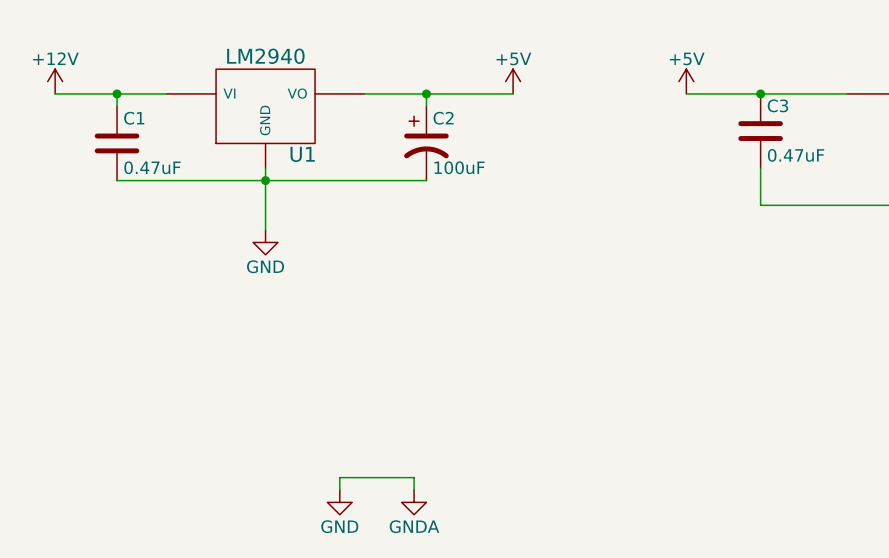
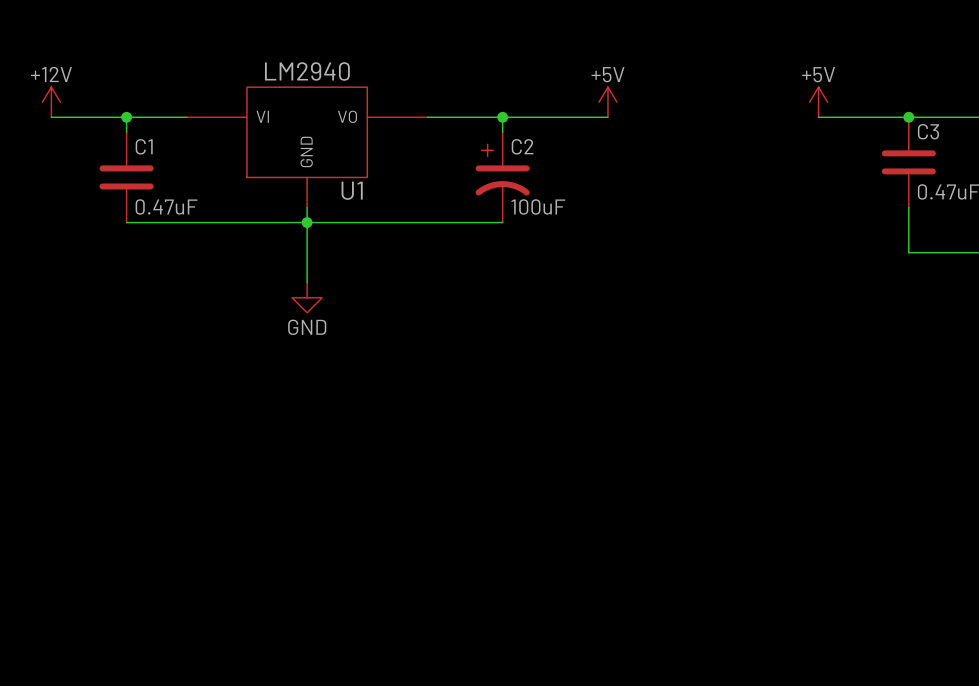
wire: (339, 490) (339, 477) (414, 477) (414, 490) -> none
power symbol: GND (339, 502) -> none
power symbol: GNDA (414, 502) -> none

